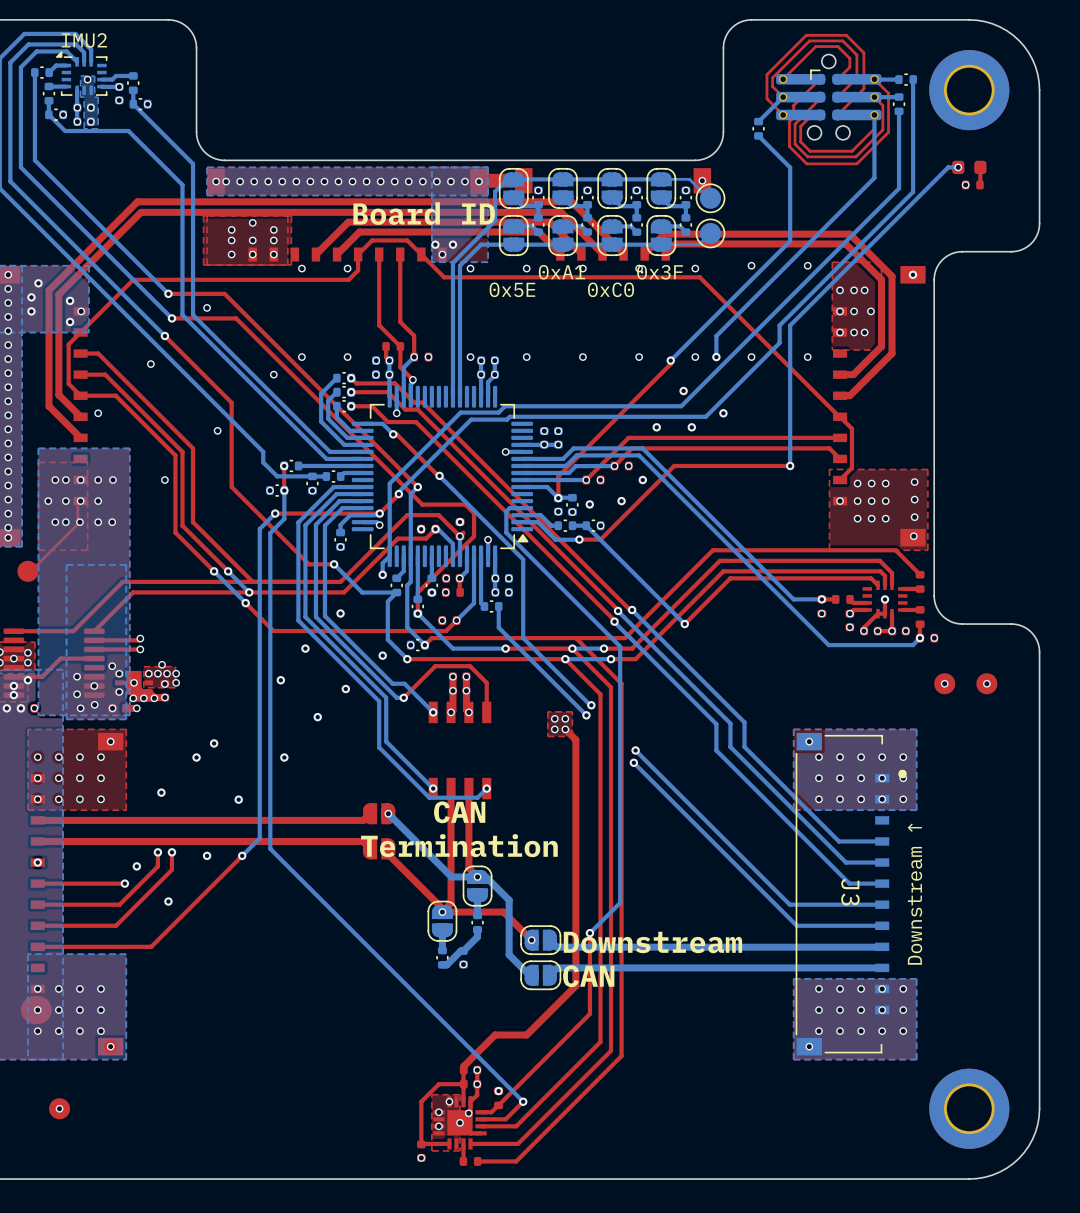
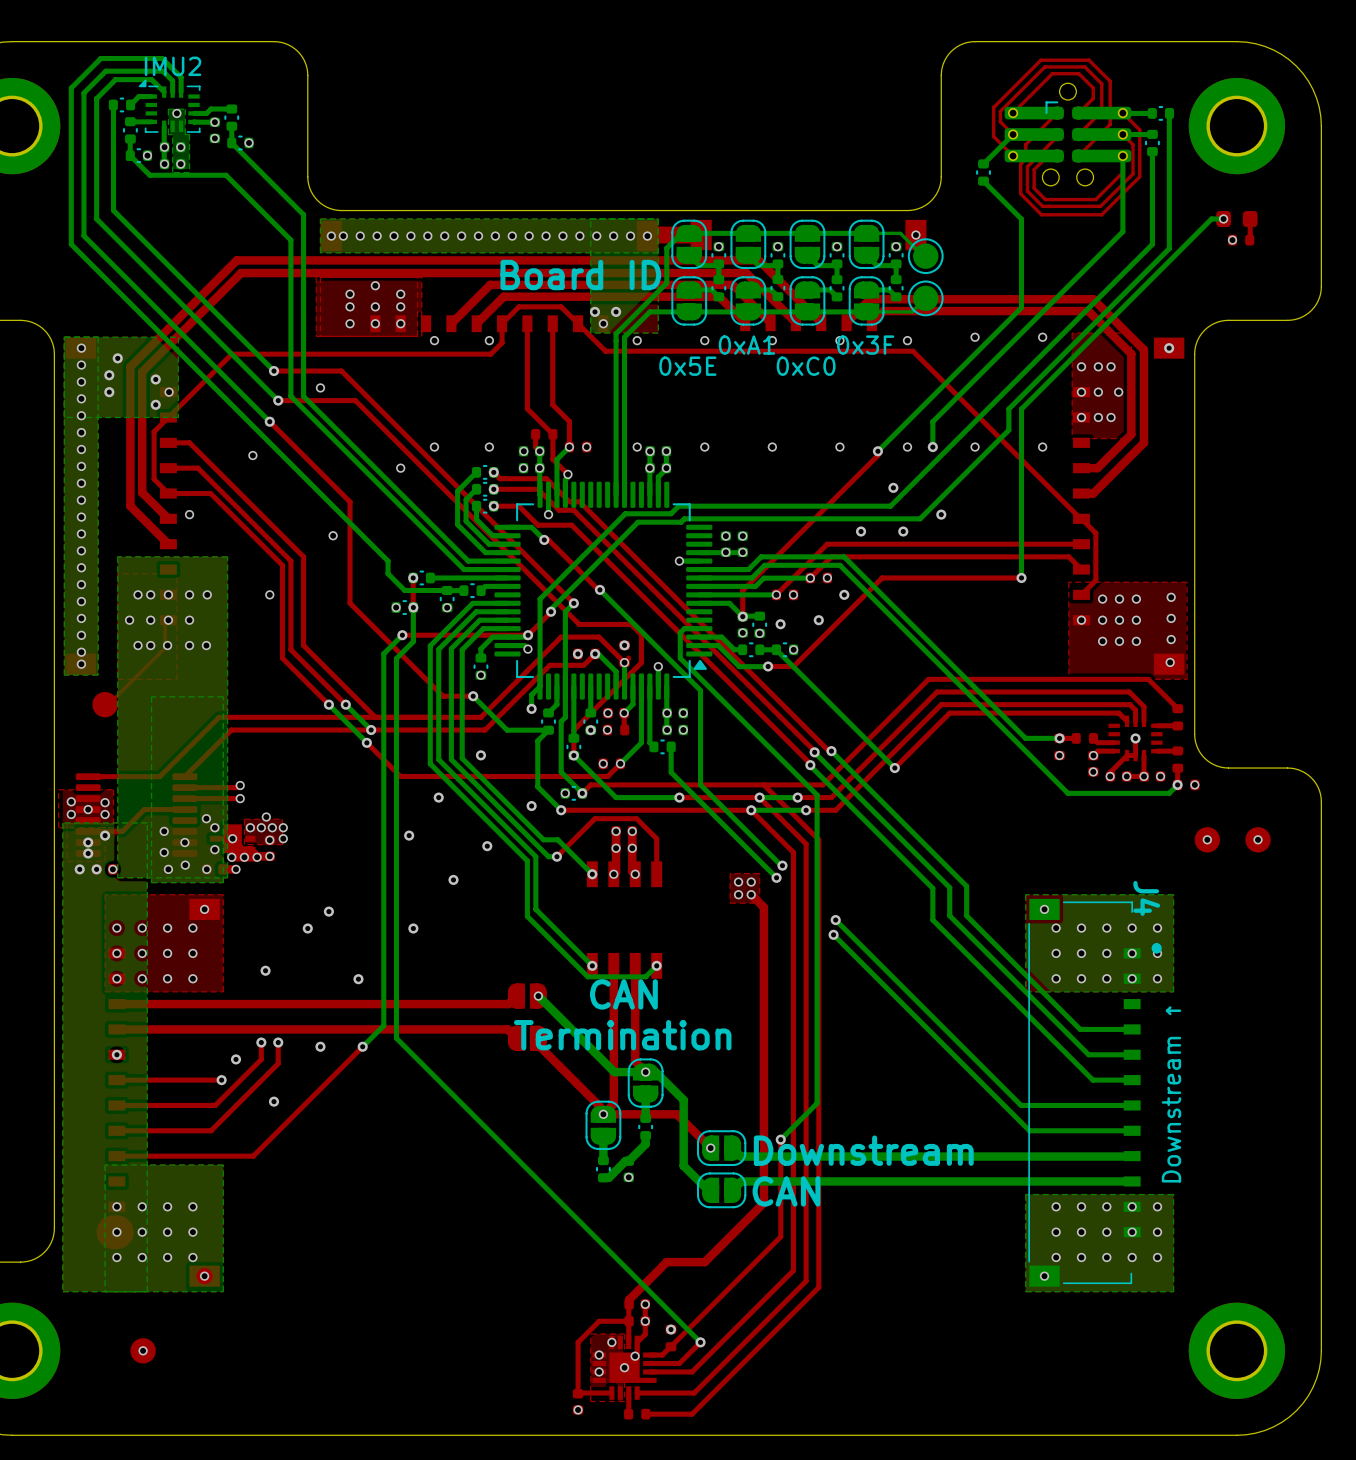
J3 name: J3 (850, 892) -> J4 (1146, 898)

